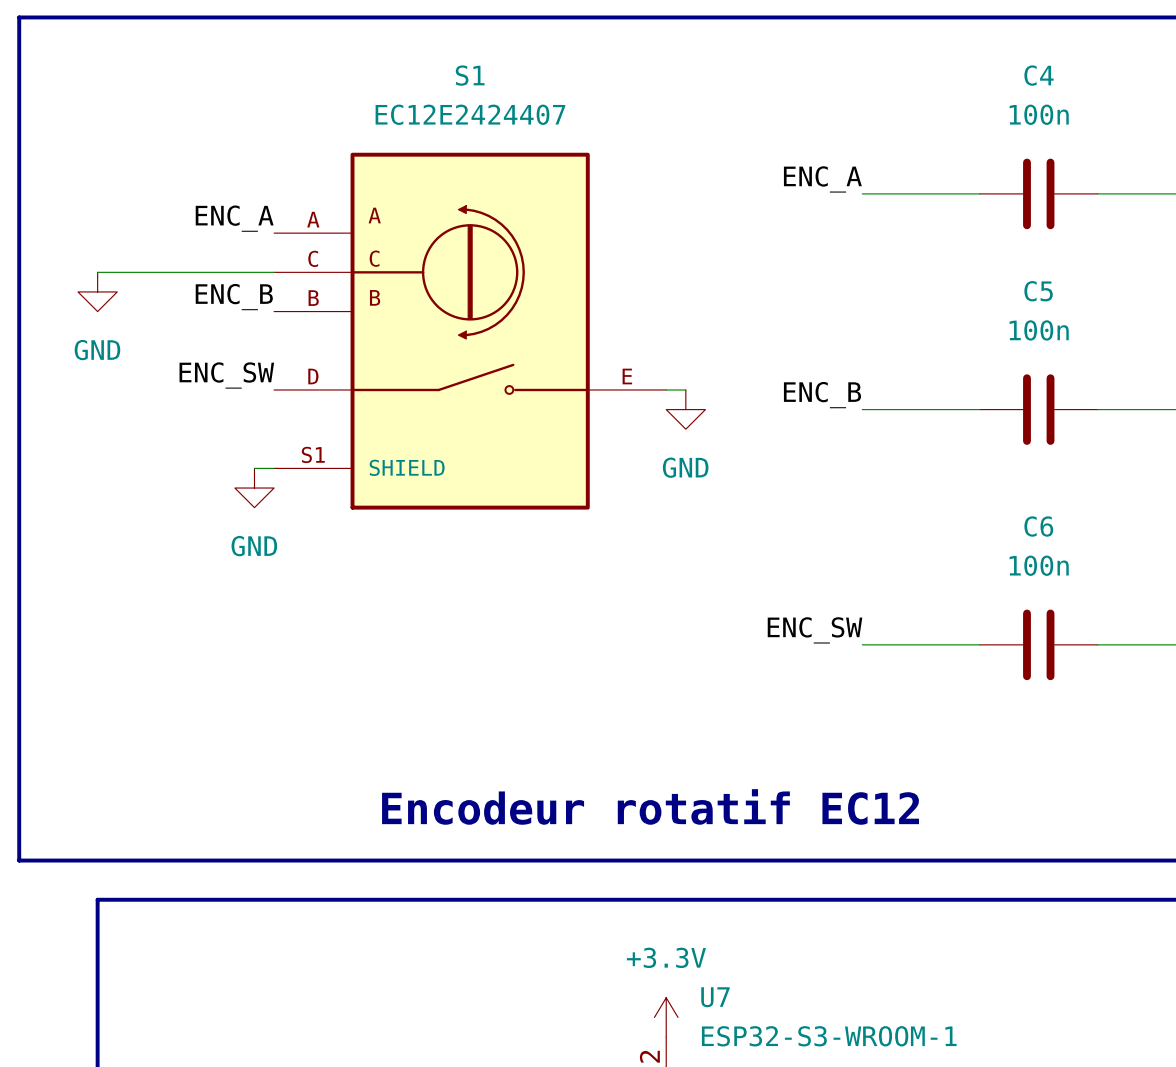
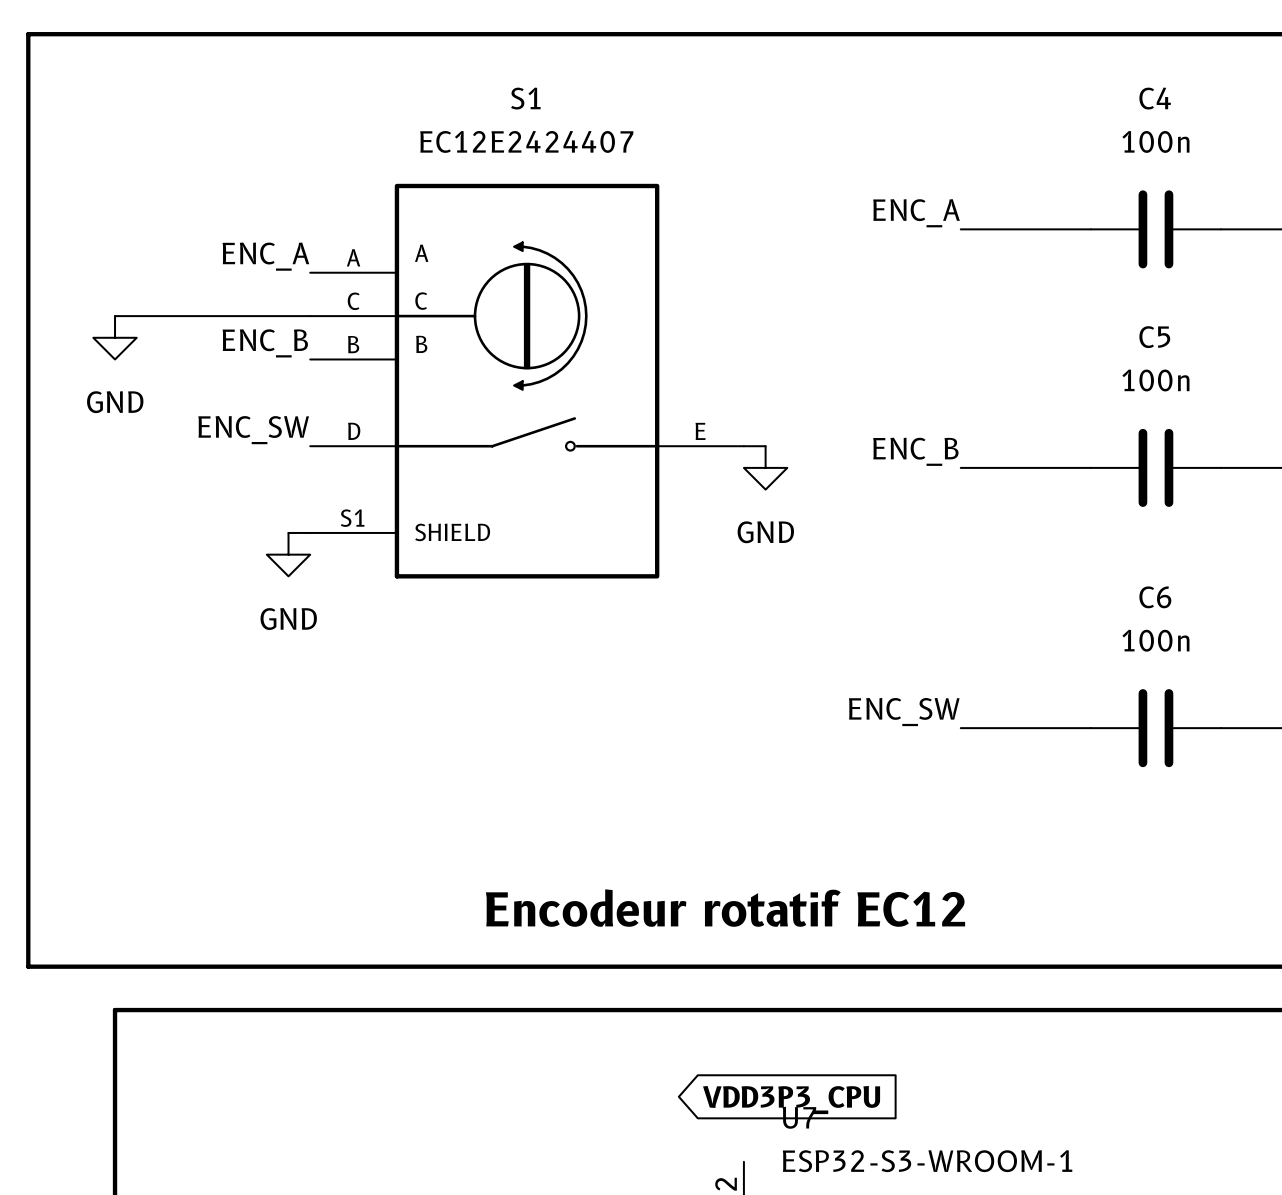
global label: none -> VDD3P3_CPU (791, 1100)
power symbol: +3.3V (666, 1017) -> none

